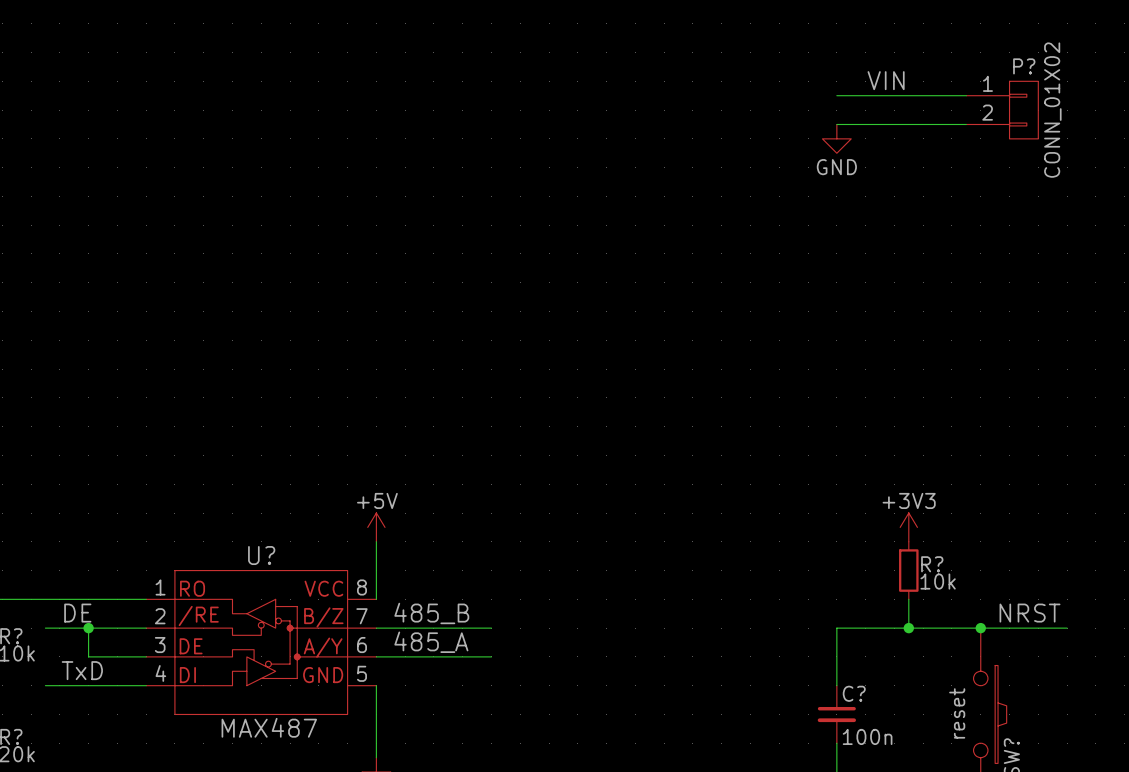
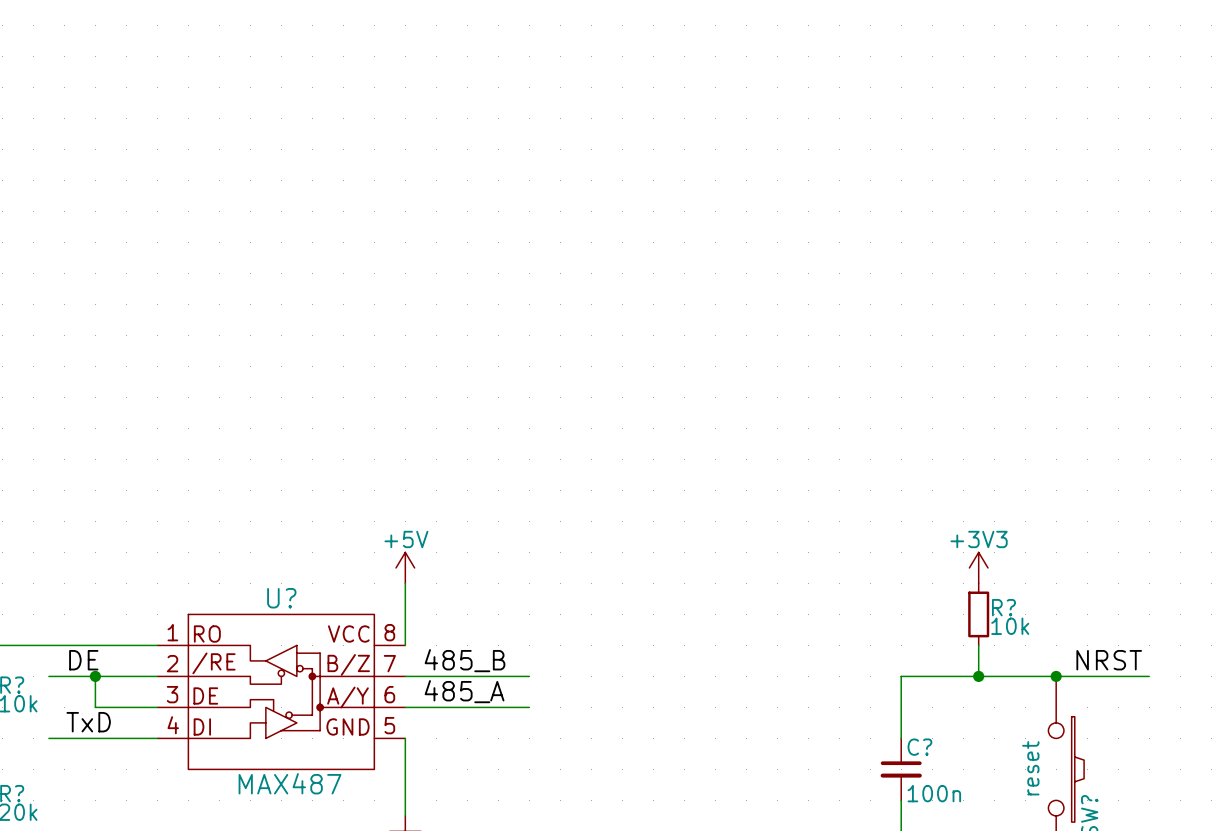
label: VIN (886, 80) -> none
wire: (836, 95) (966, 95) -> none
P?: CONN_01X02 (1002, 110) -> none
wire: (836, 124) (966, 124) -> none
power symbol: GND (836, 138) -> none

